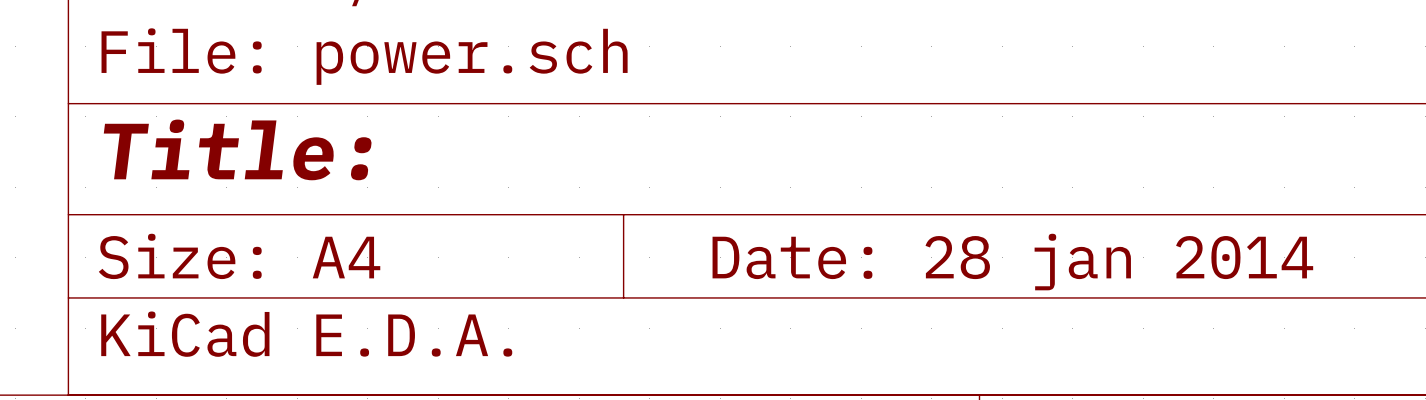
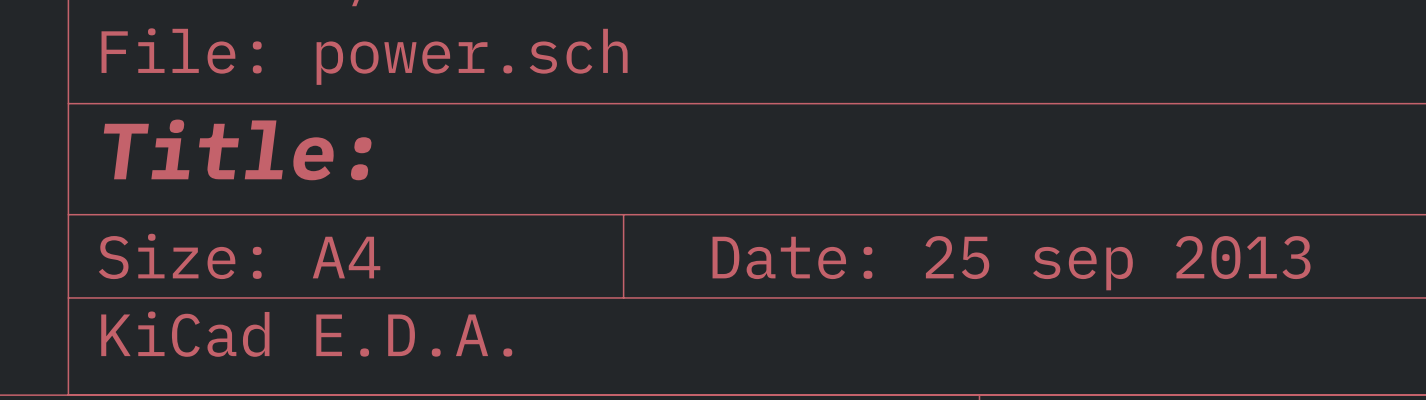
title block: Date: 28 jan 2014 (1012, 262) -> Date: 25 sep 2013 (1011, 263)

